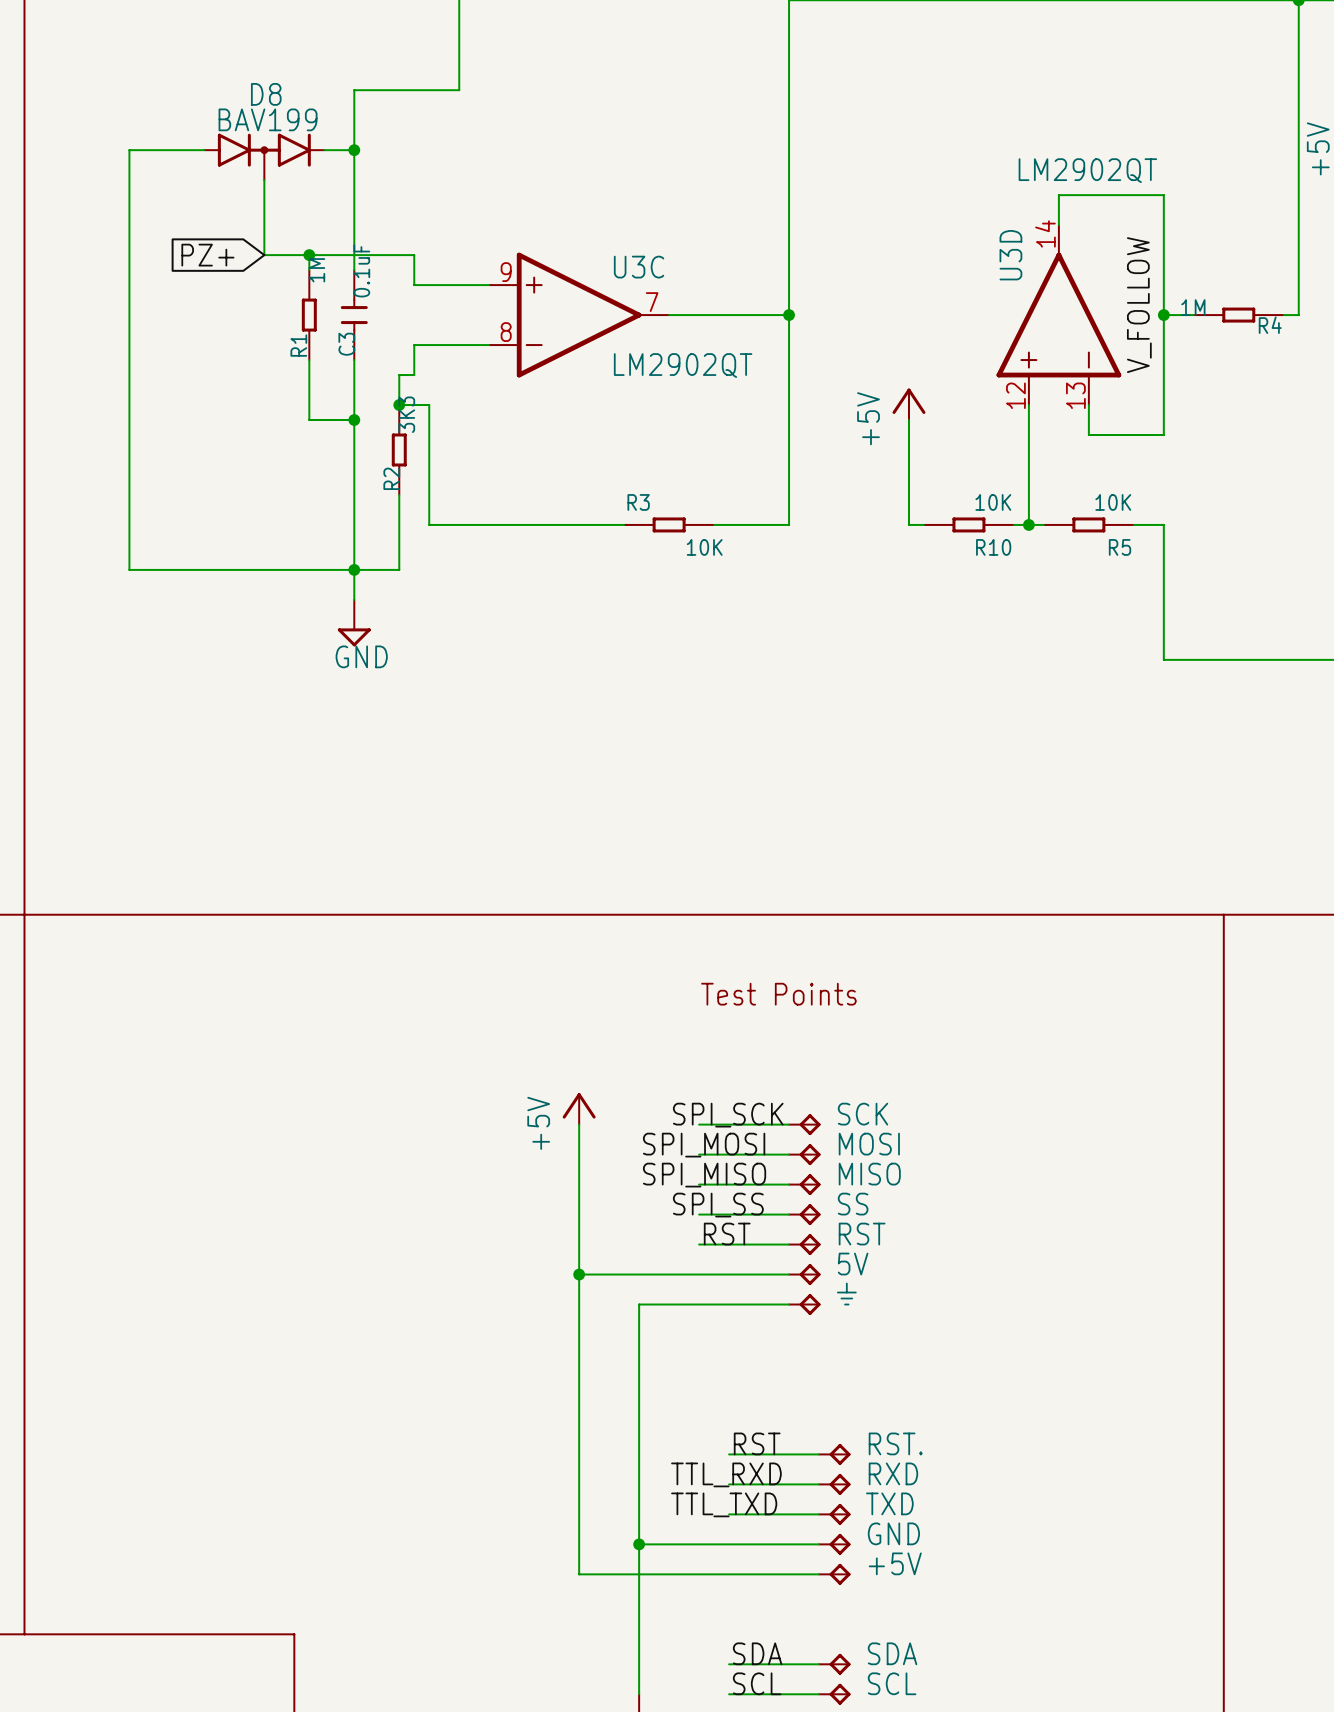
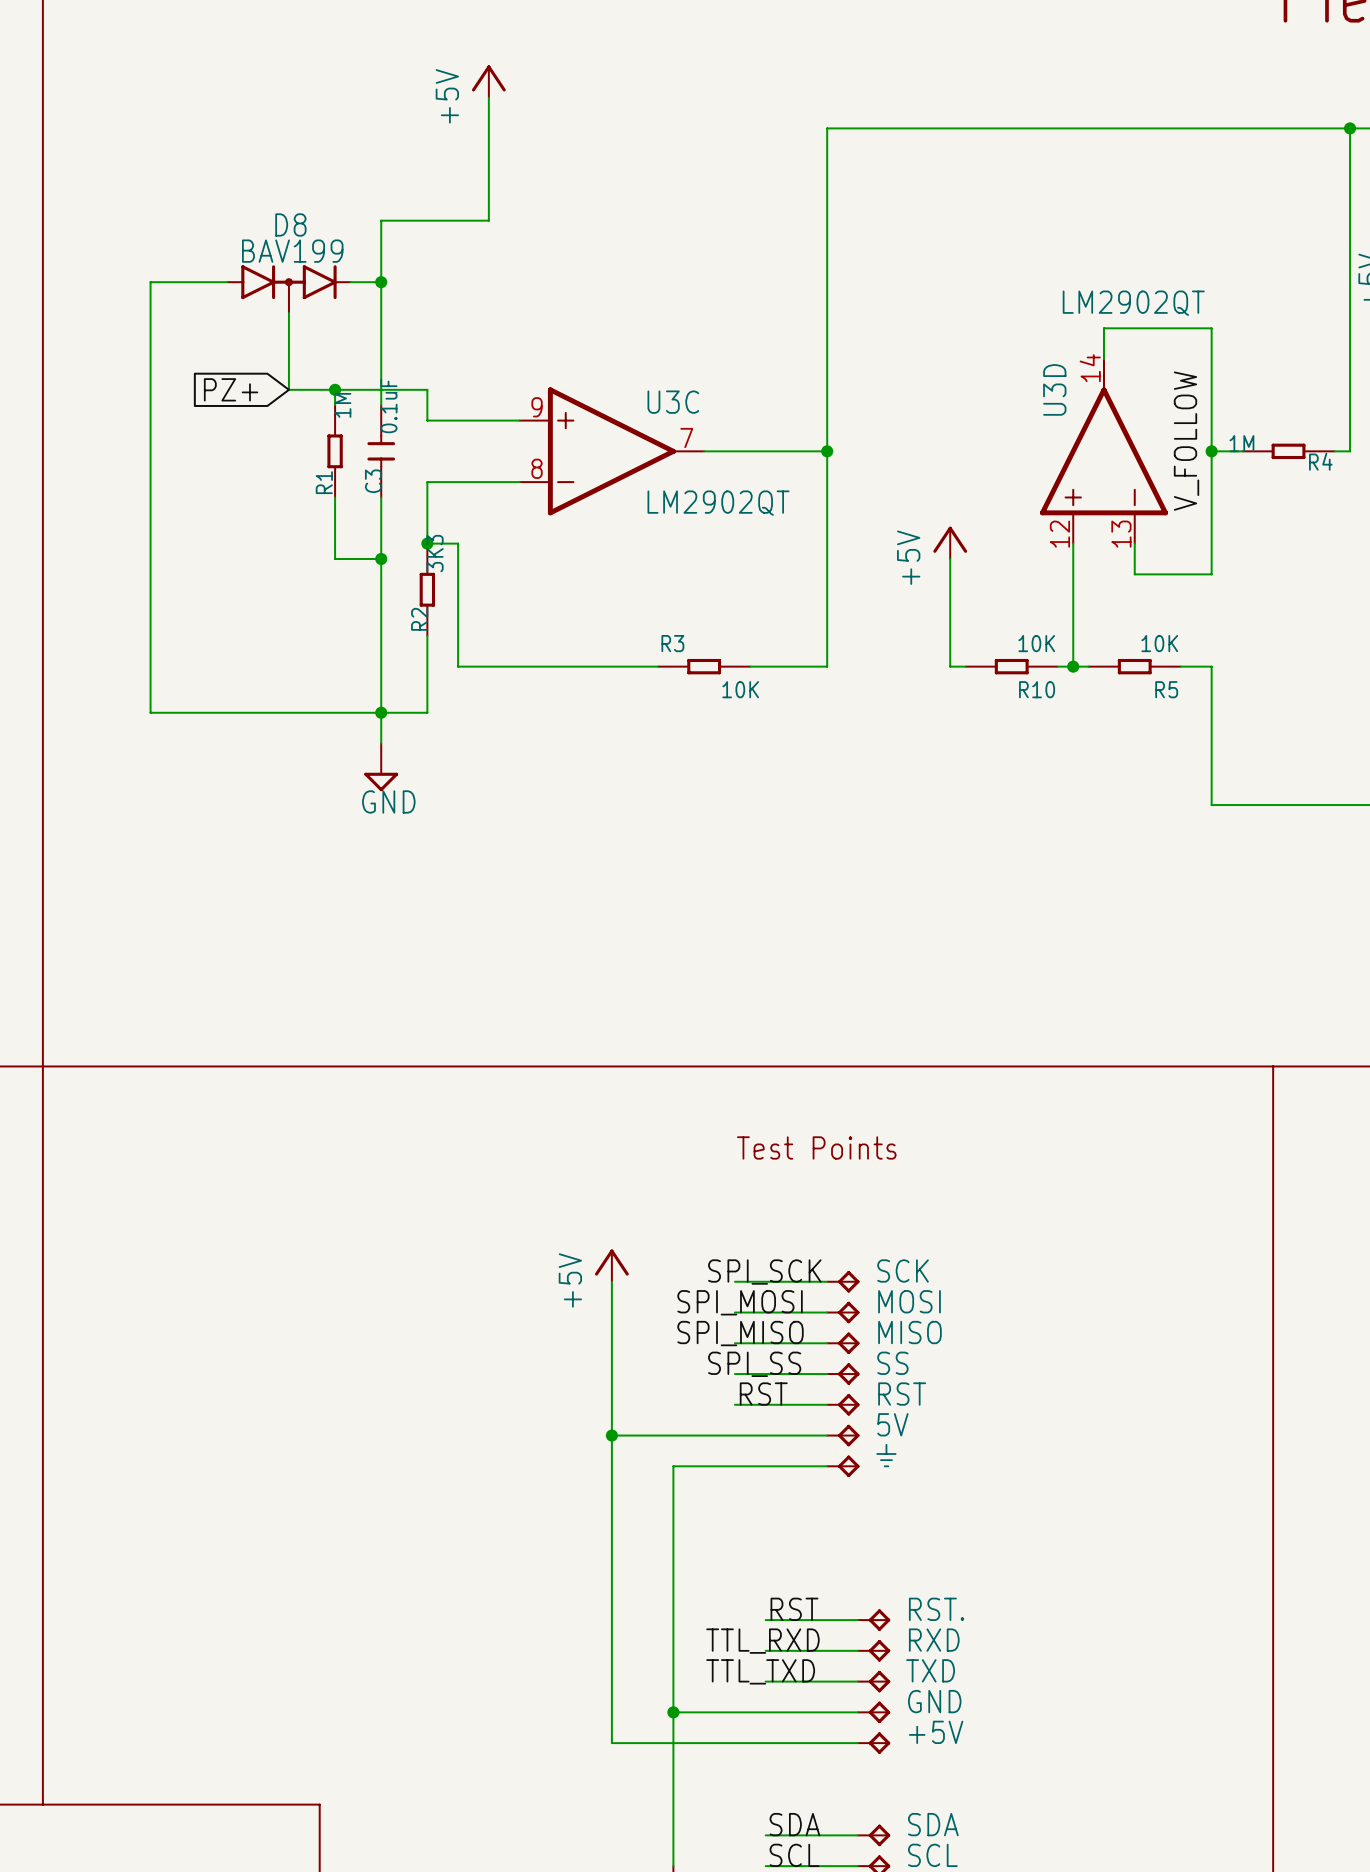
wire: (399, 255) (414, 255) (414, 285) -> (427, 389) (427, 420) (442, 420)
wire: (414, 345) (414, 375) (399, 375) -> (442, 482) (427, 482) (427, 512)

